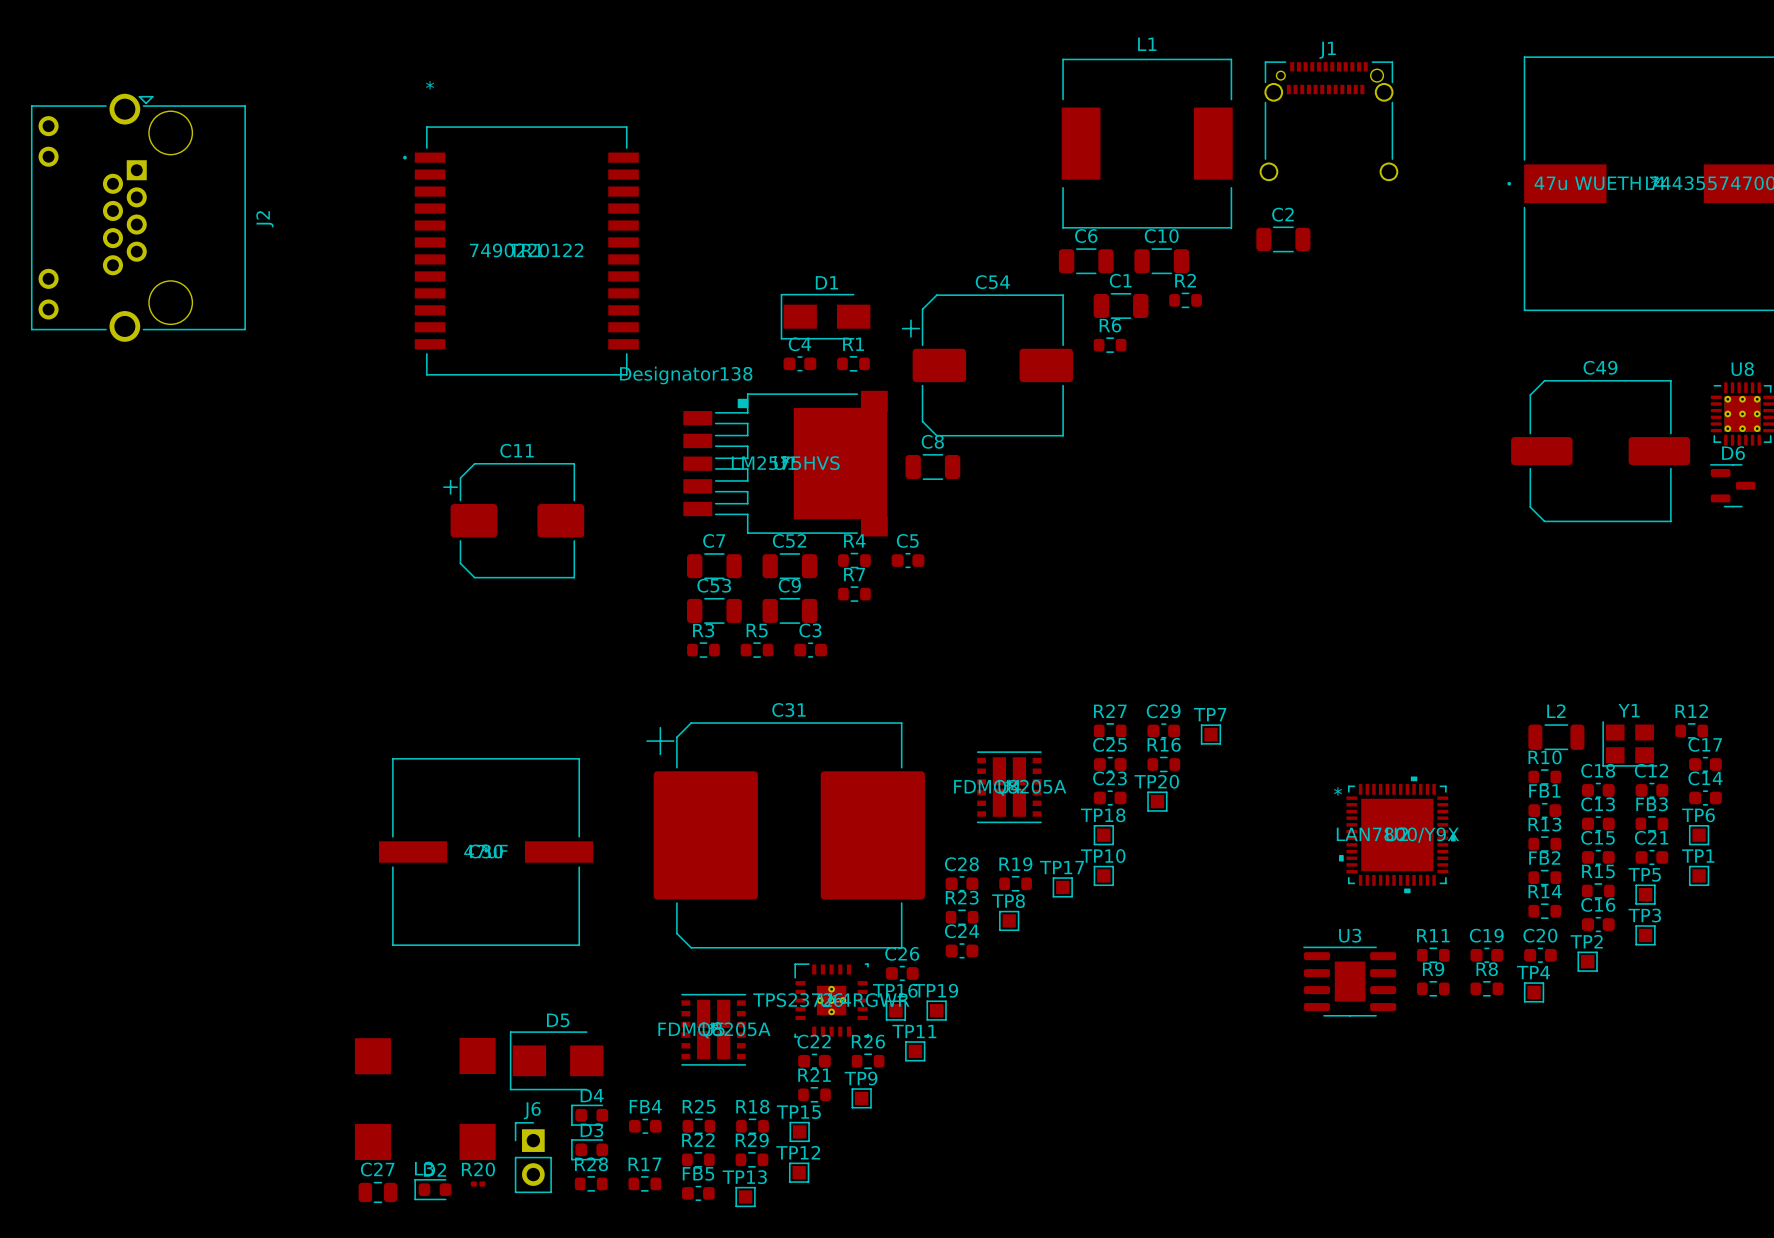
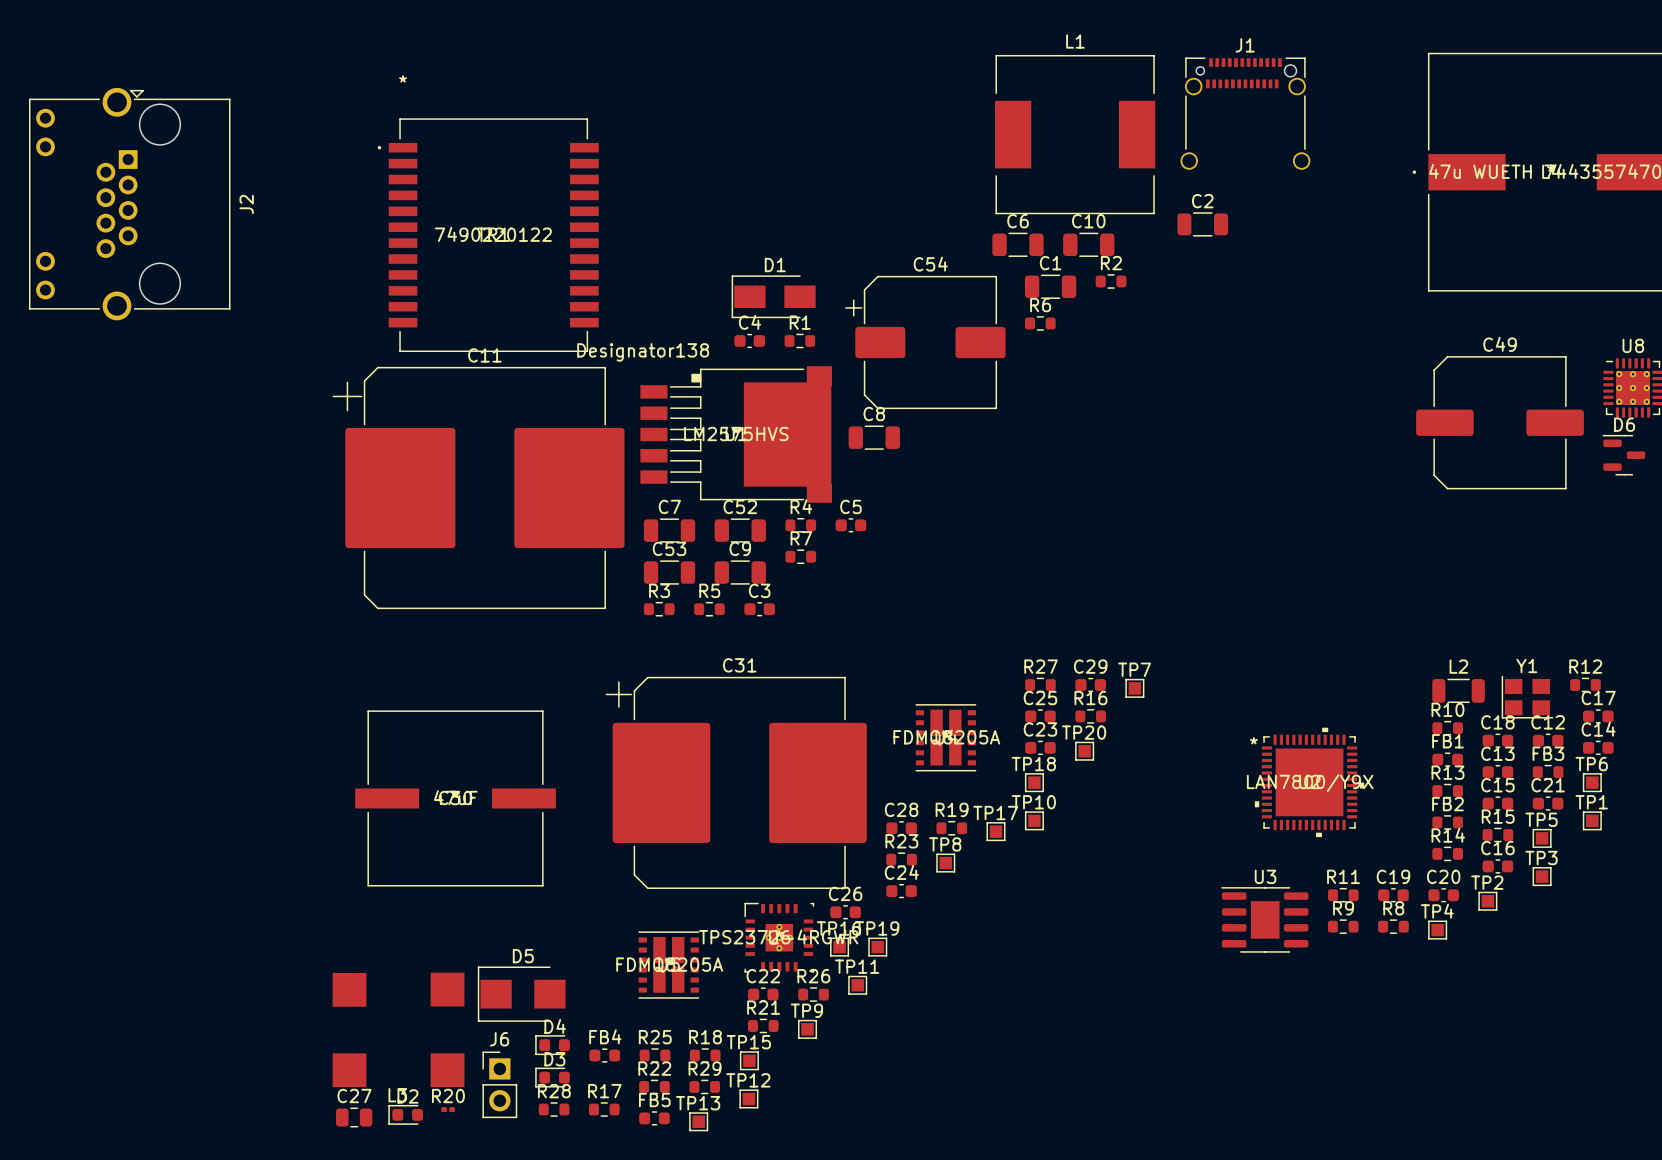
C11 name position: C11 (517, 450) -> C11 (484, 355)
C11 footprint: [443, 463, 585, 579] -> [332, 366, 625, 610]

